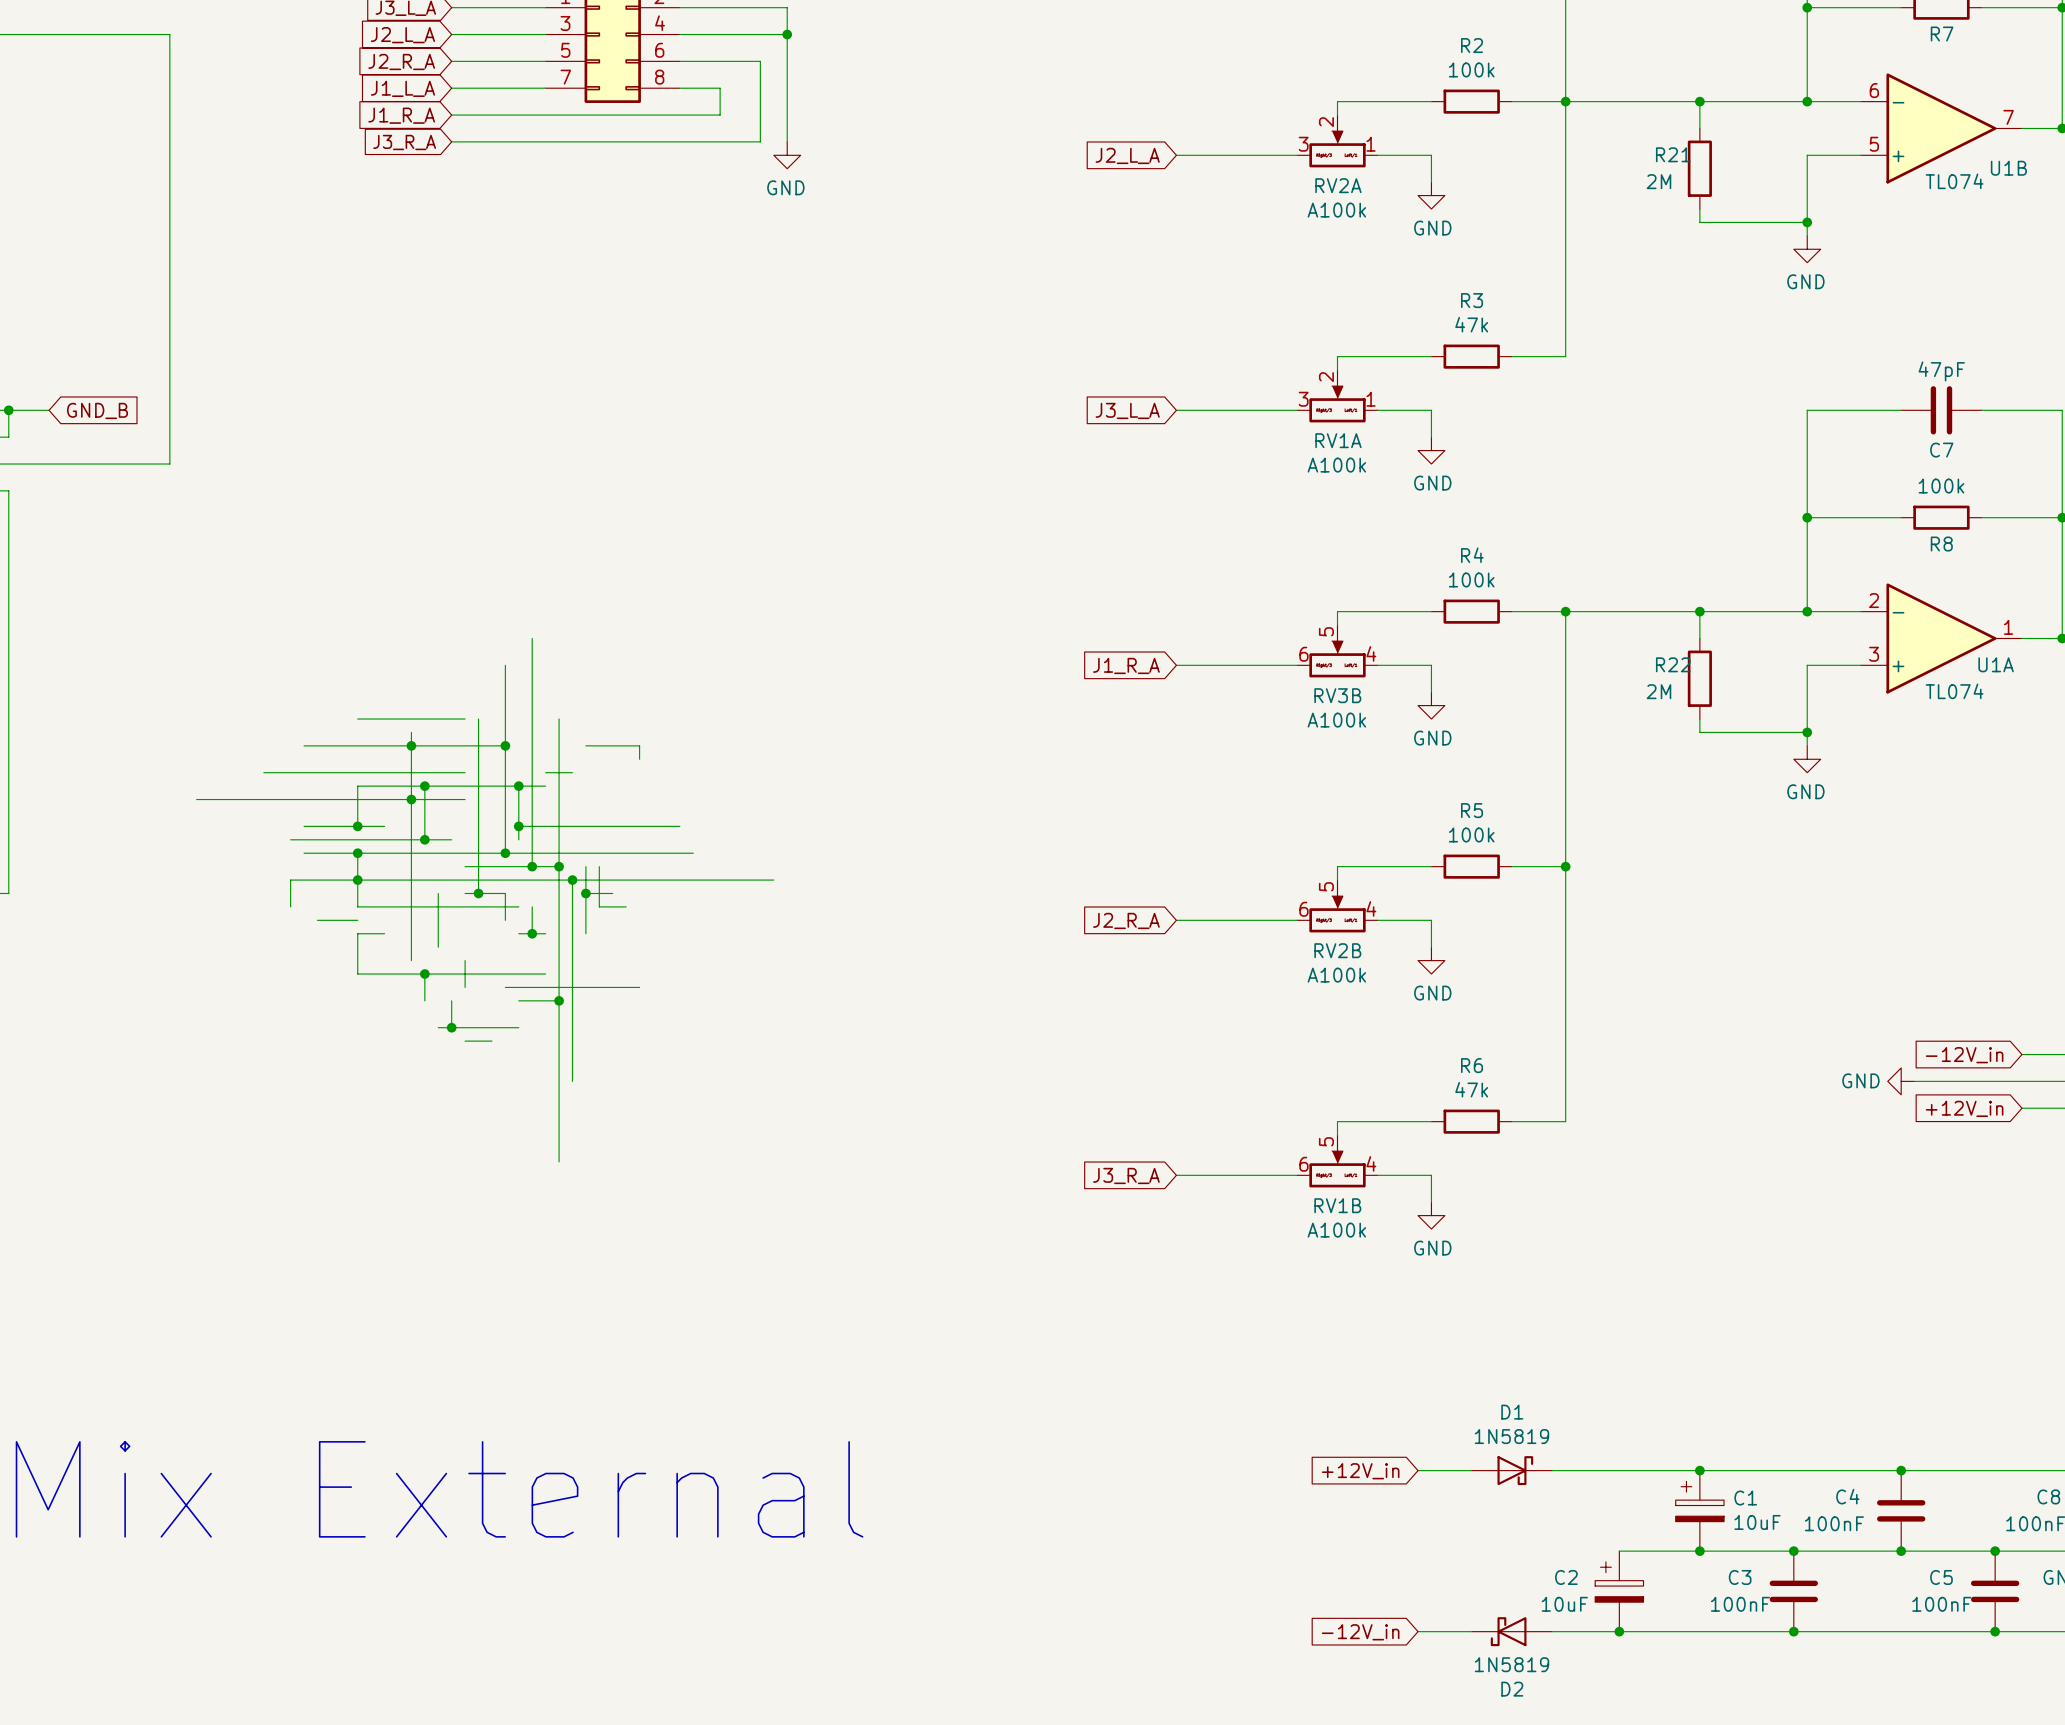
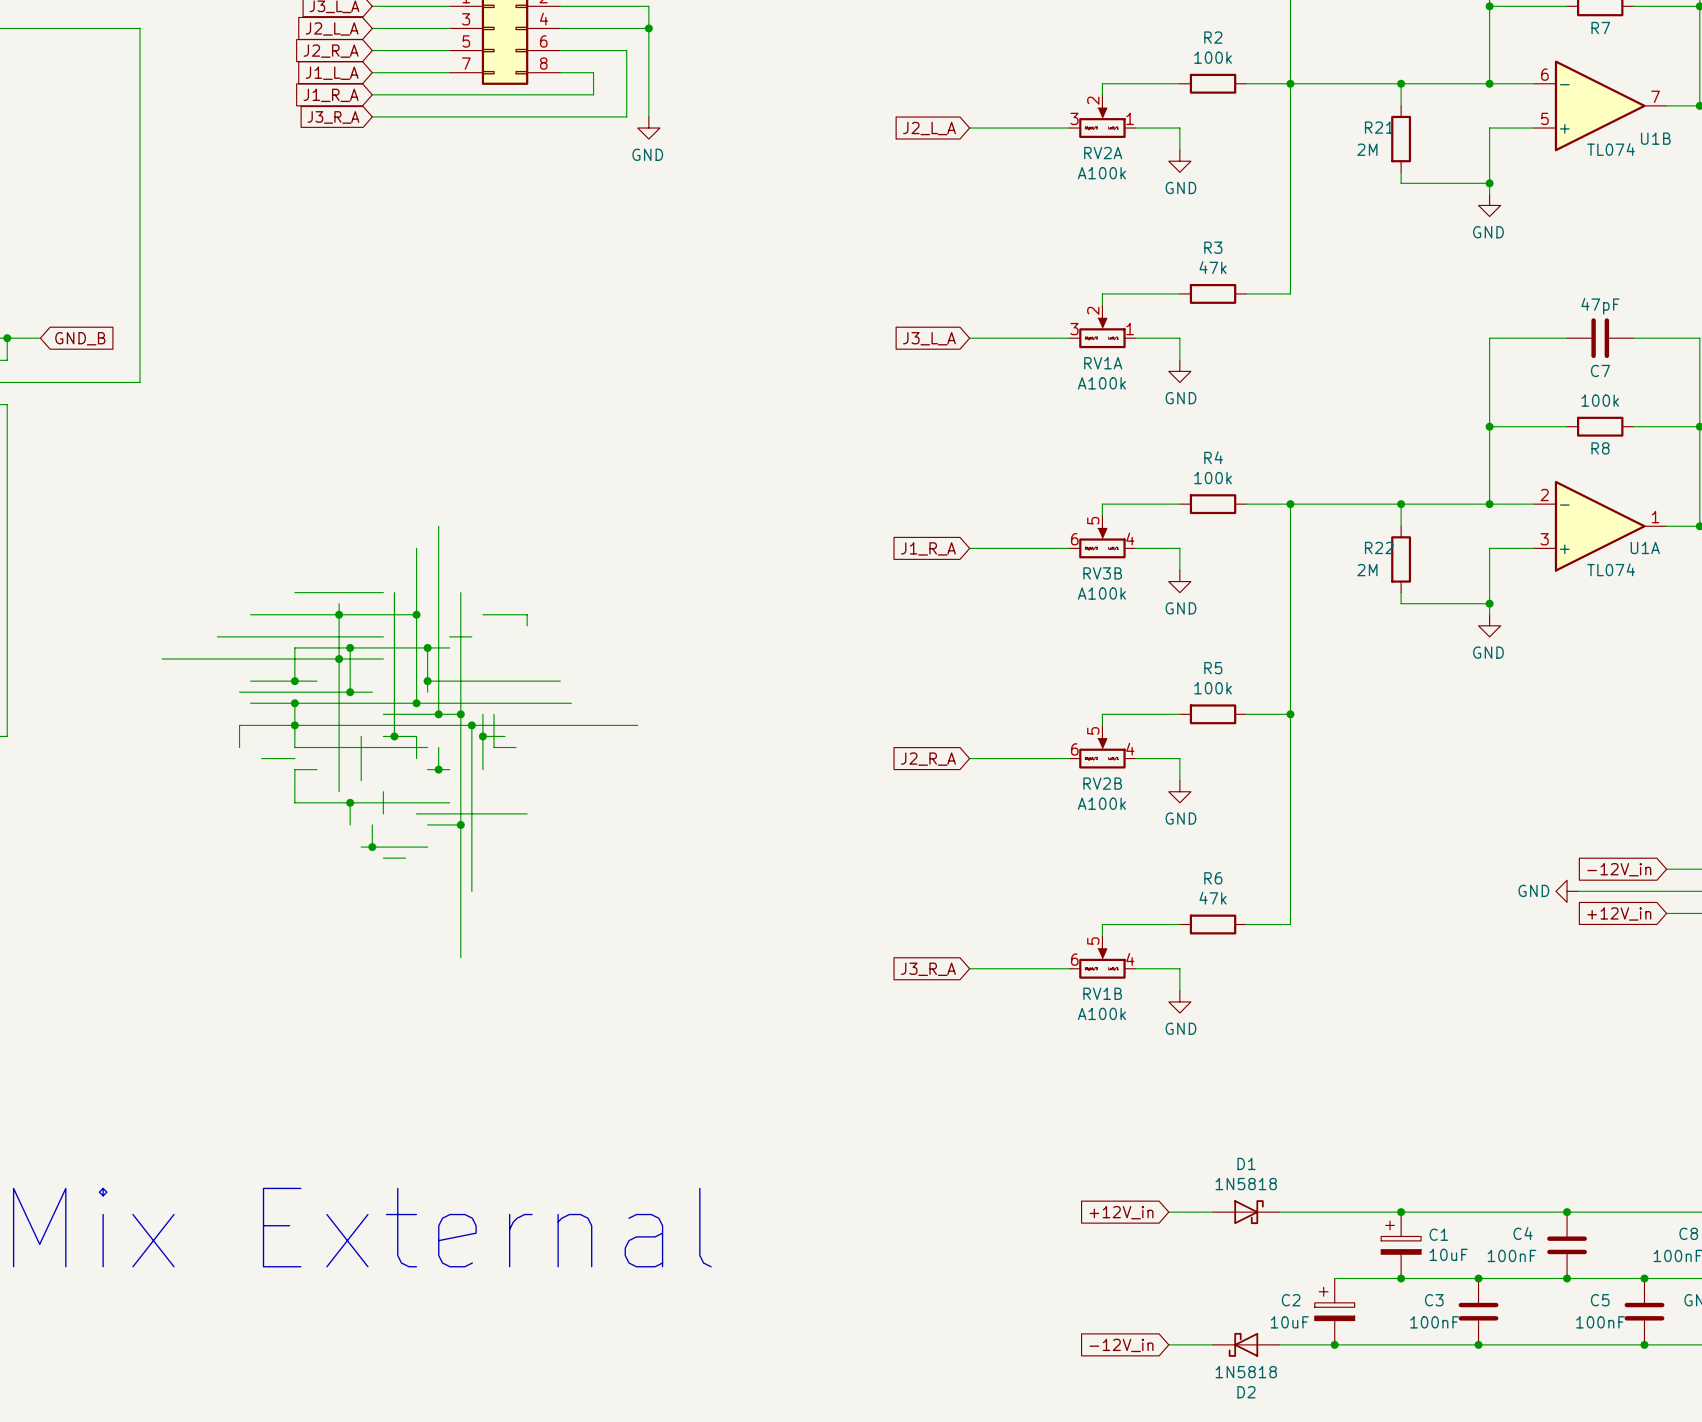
D1 value: 1N5819 (1511, 1436) -> 1N5818 (1246, 1184)
D2 value: 1N5819 (1511, 1664) -> 1N5818 (1246, 1372)

